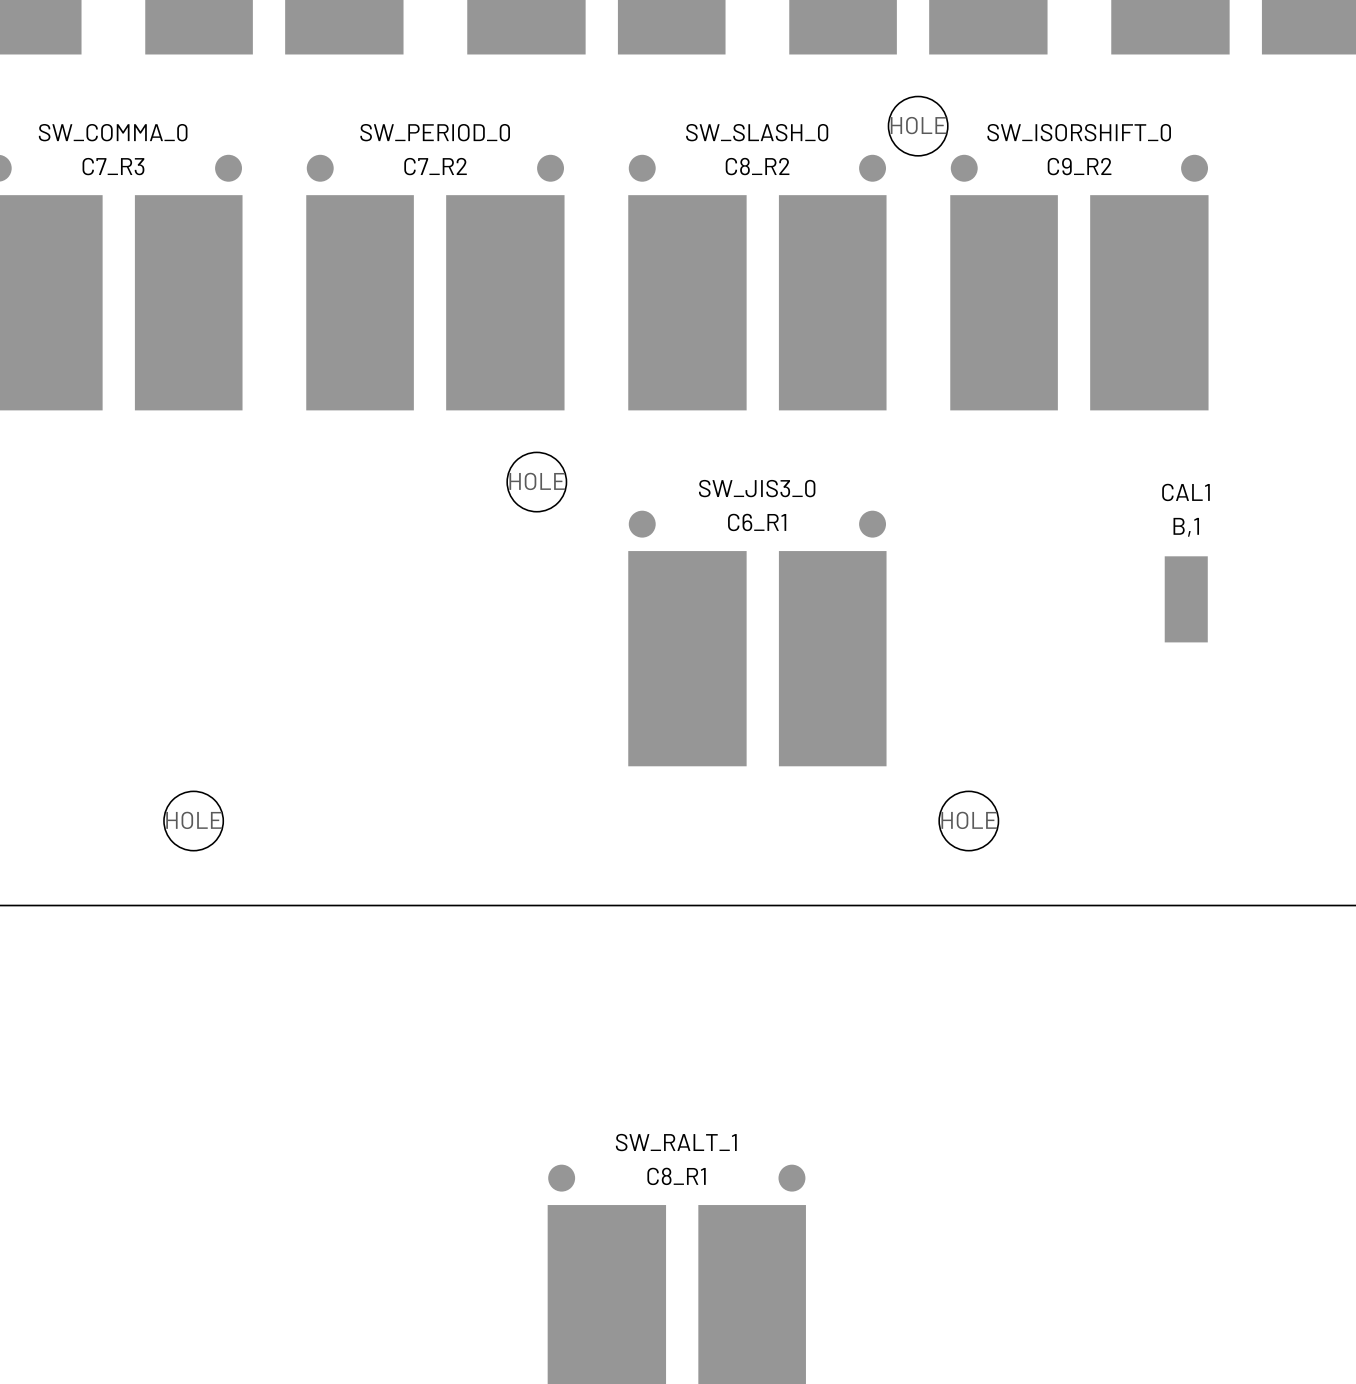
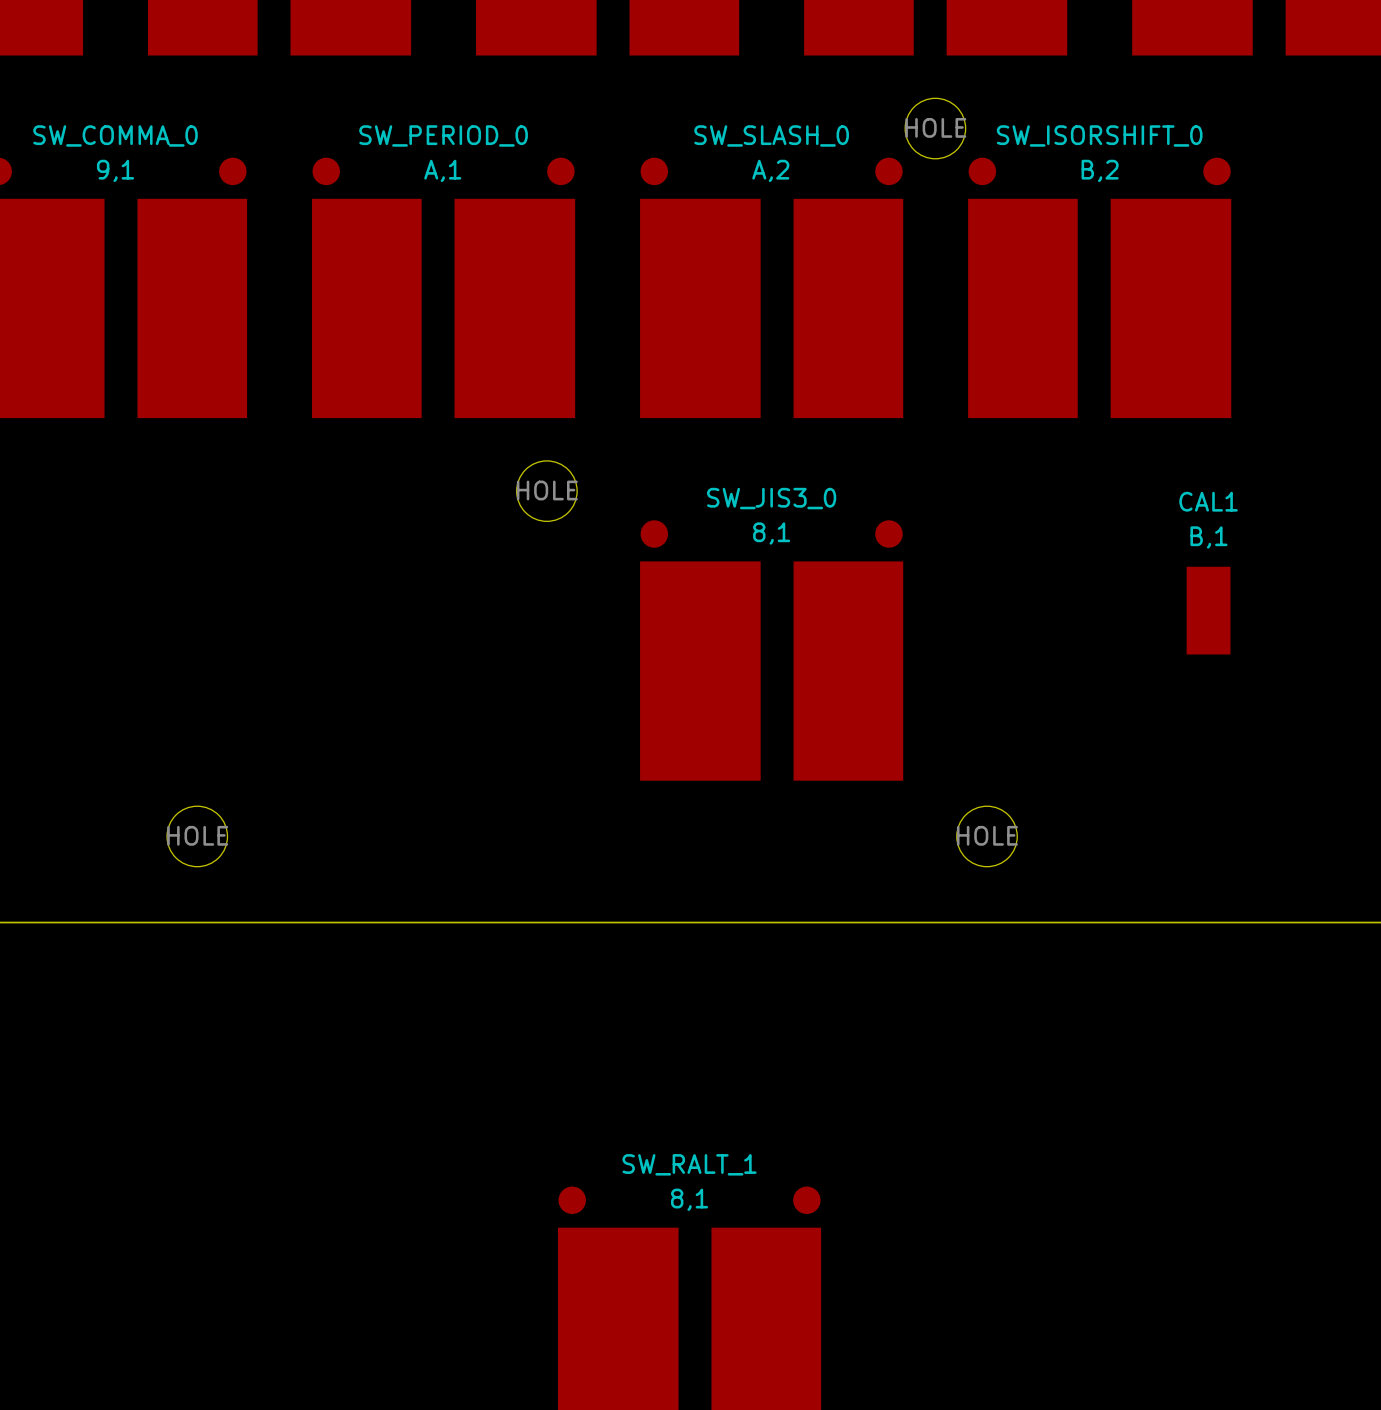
SW_COMMA_0 value: C7_R3 (113, 166) -> 9,1 (115, 170)
SW_PERIOD_0 value: C7_R2 (435, 166) -> A,1 (442, 170)
SW_SLASH_0 value: C8_R2 (757, 166) -> A,2 (770, 170)
SW_ISORSHIFT_0 value: C9_R2 (1079, 166) -> B,2 (1100, 170)
SW_JIS3_0 value: C6_R1 (757, 522) -> 8,1 (771, 533)
SW_RALT_1 value: C8_R1 (676, 1176) -> 8,1 (689, 1199)

